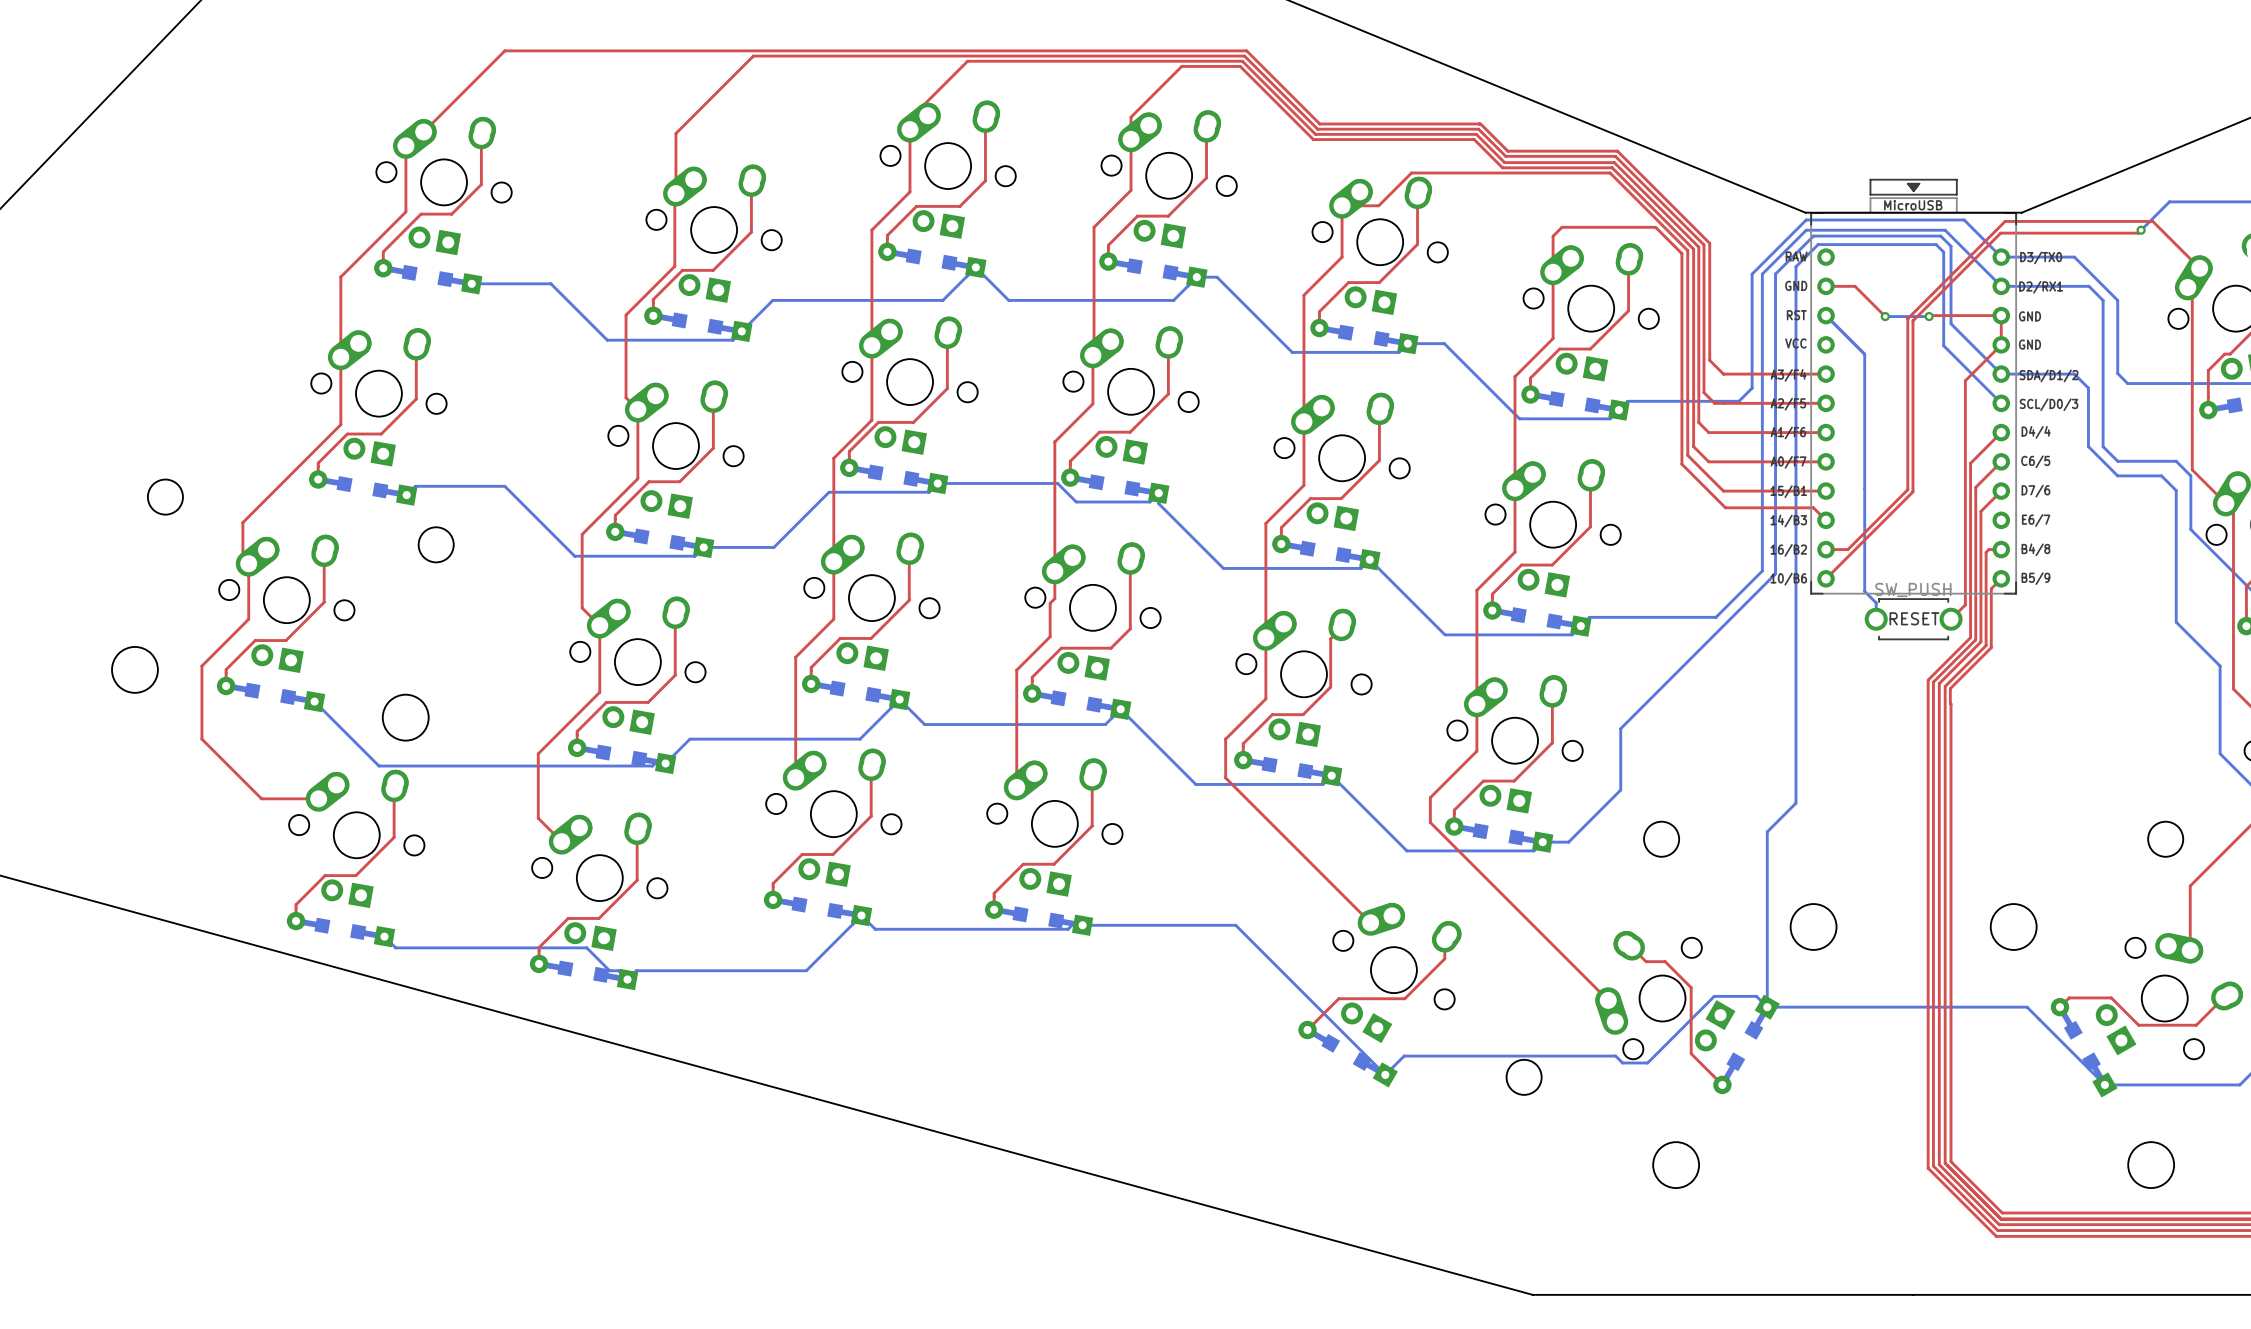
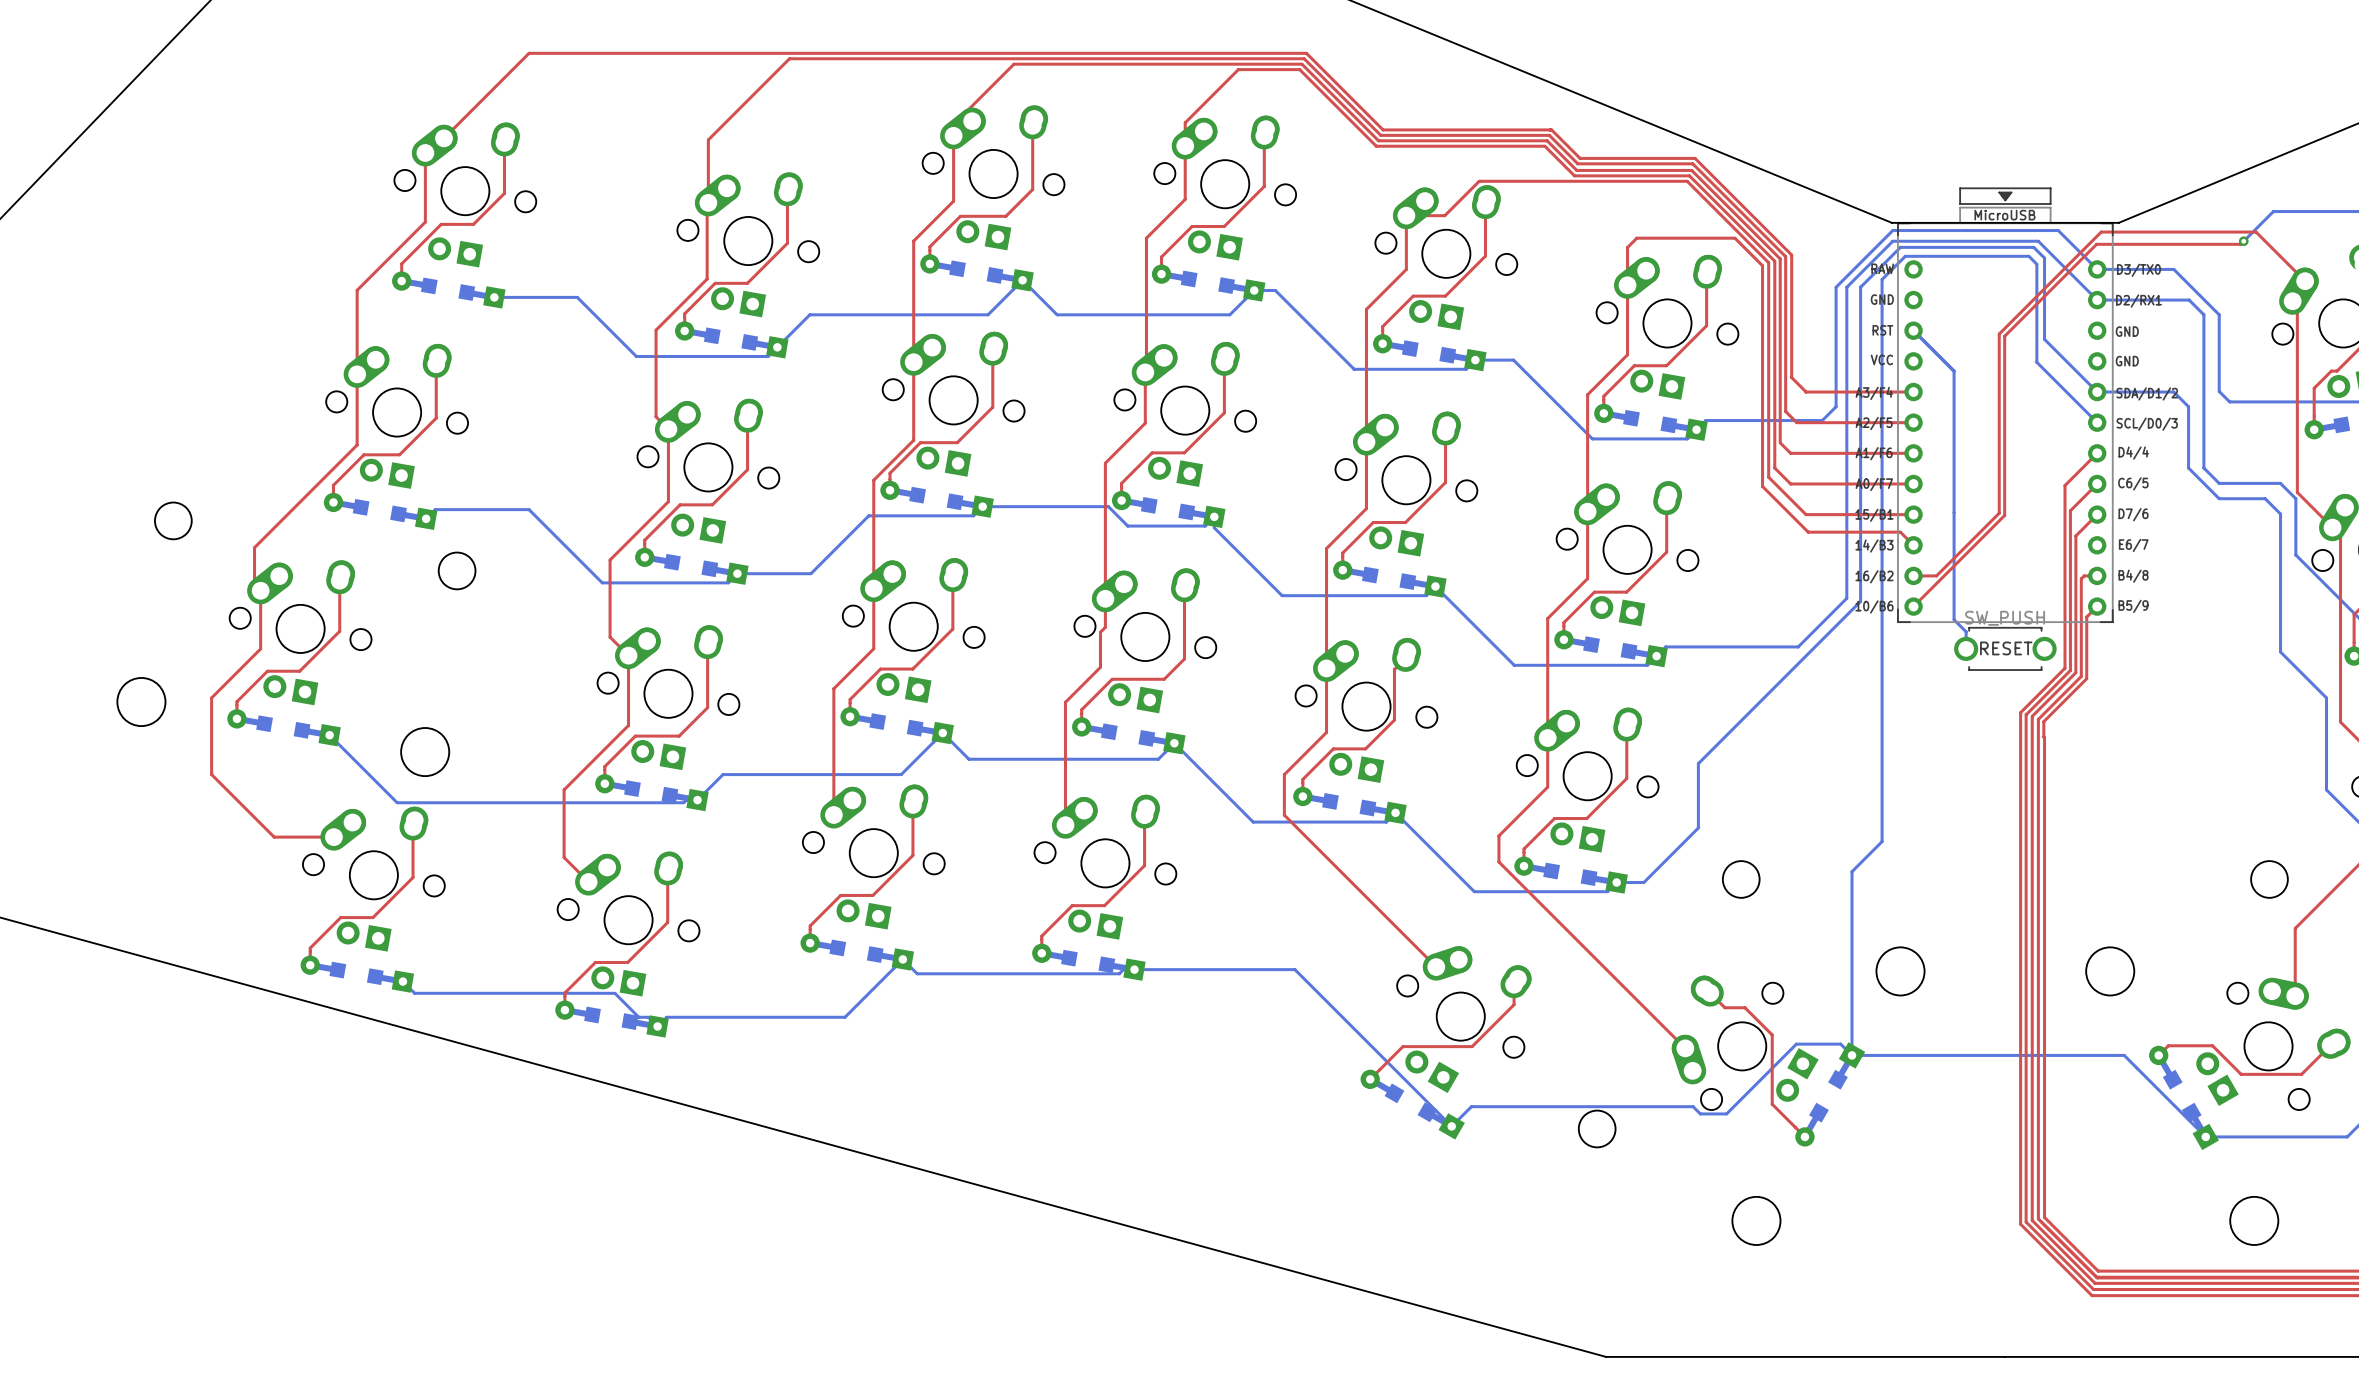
top track: (1826, 286) (1855, 286) (1883, 315) -> none
bottom track: (1885, 316) (1929, 316) -> none
via: (1885, 316) -> none
top track: (1929, 316) (2001, 315) (2001, 344) (1965, 380) (1965, 604) (1951, 619) -> none
via: (1929, 316) -> none

